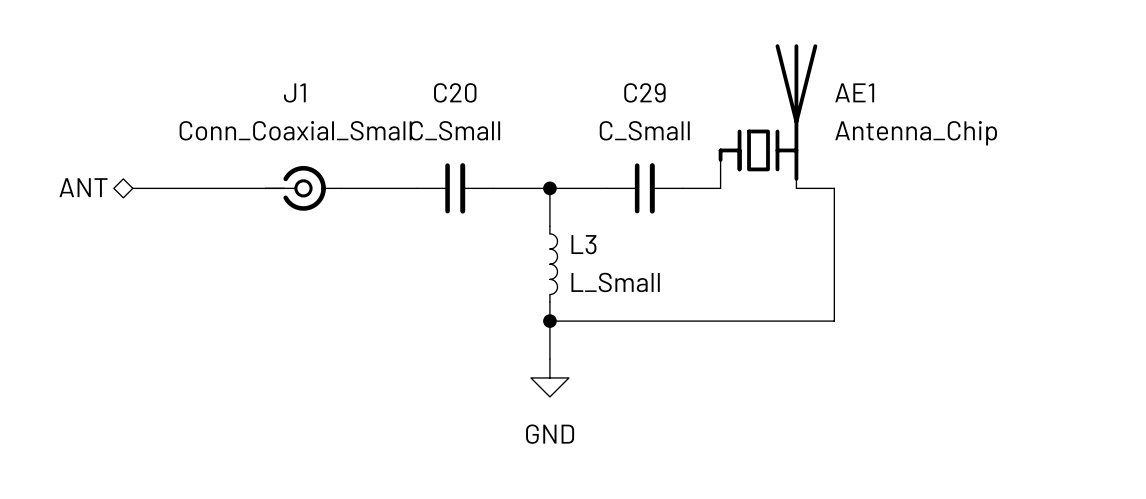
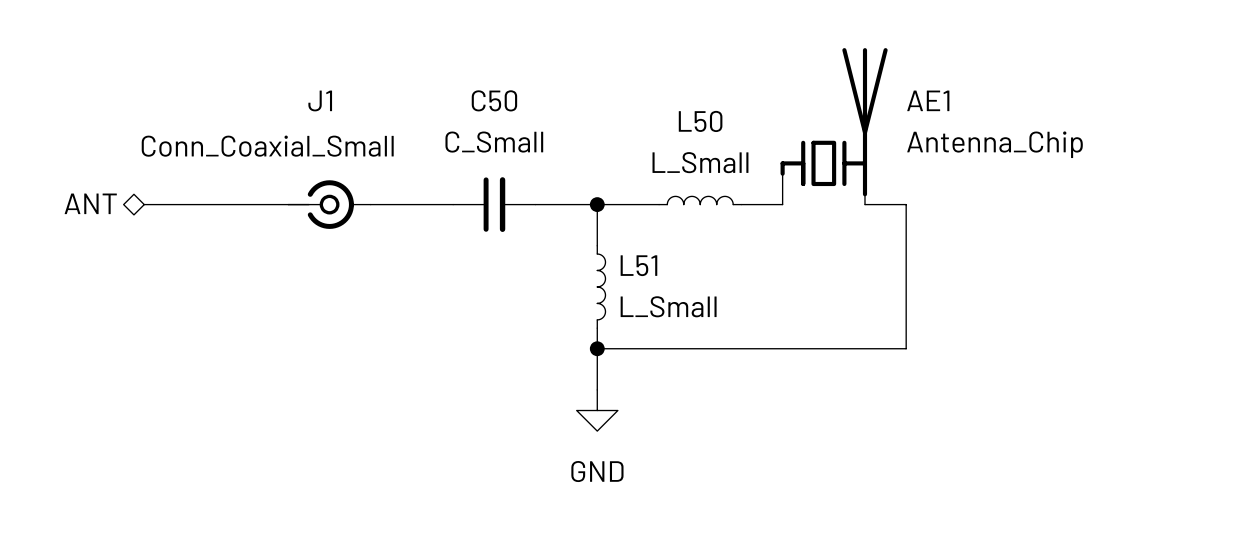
C20 name: C20 (455, 92) -> C50 (494, 100)
J1 value position: Conn_Coaxial_Small (295, 130) -> Conn_Coaxial_Small (267, 146)
L50: none -> L_Small (700, 200)
C29: C_Small (644, 188) -> none
L3 name: L3 (583, 244) -> L51 (638, 265)

